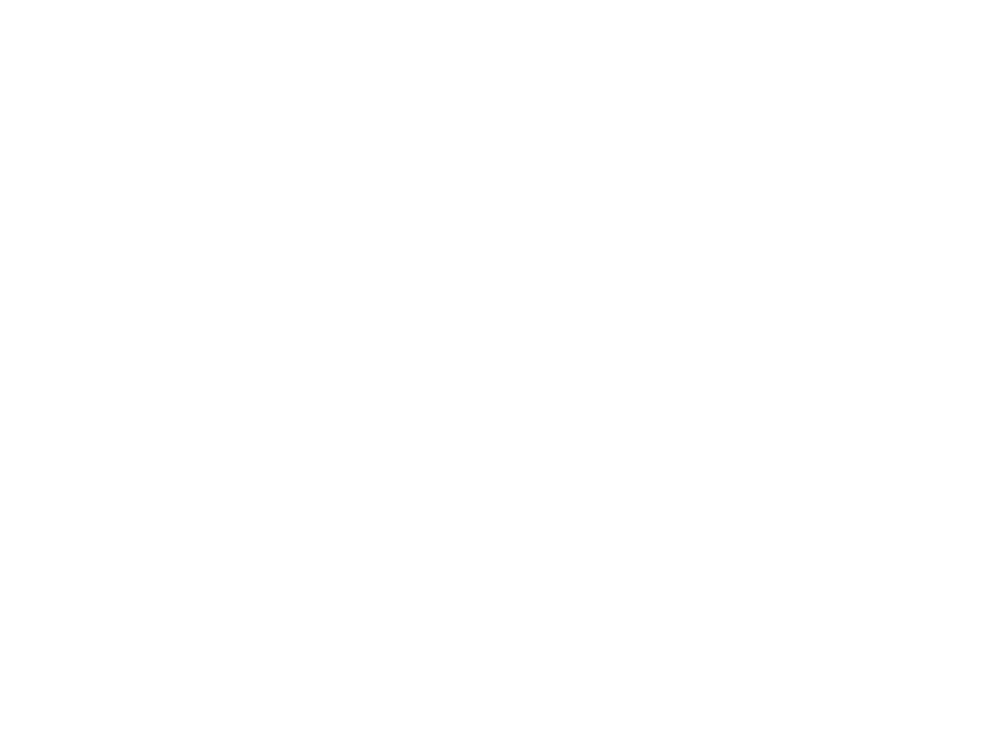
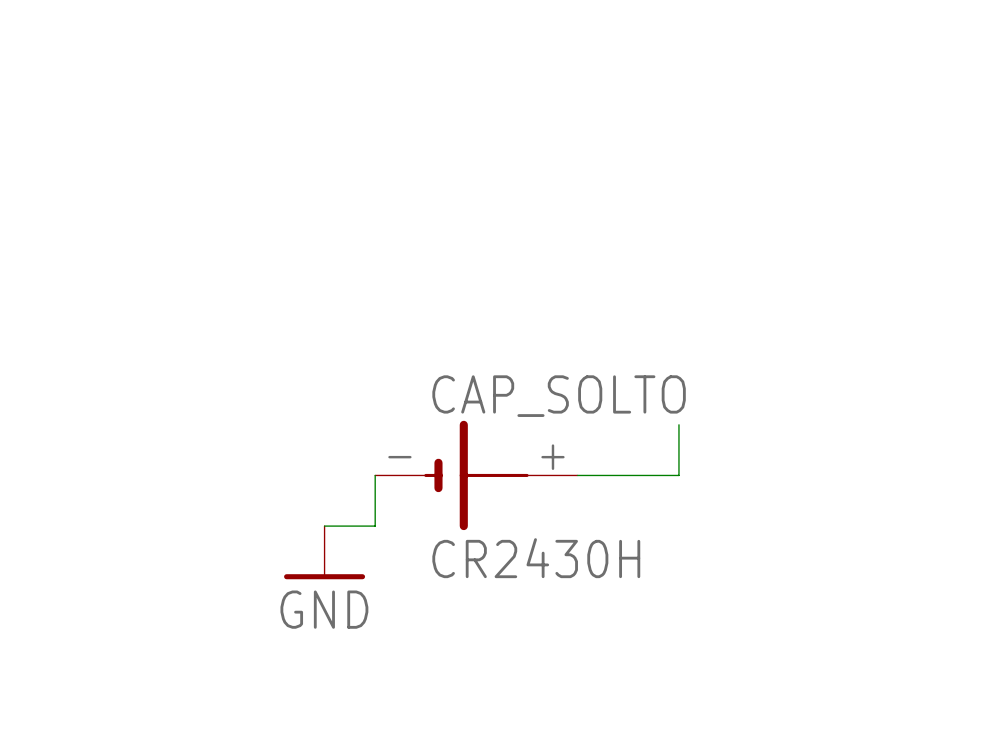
wire: none -> (678, 424) (678, 475) (577, 475)
wire: none -> (375, 475) (375, 526) (324, 526)
CAP_SOLTO: none -> CR2430H (476, 475)
power symbol: none -> GND (324, 552)

